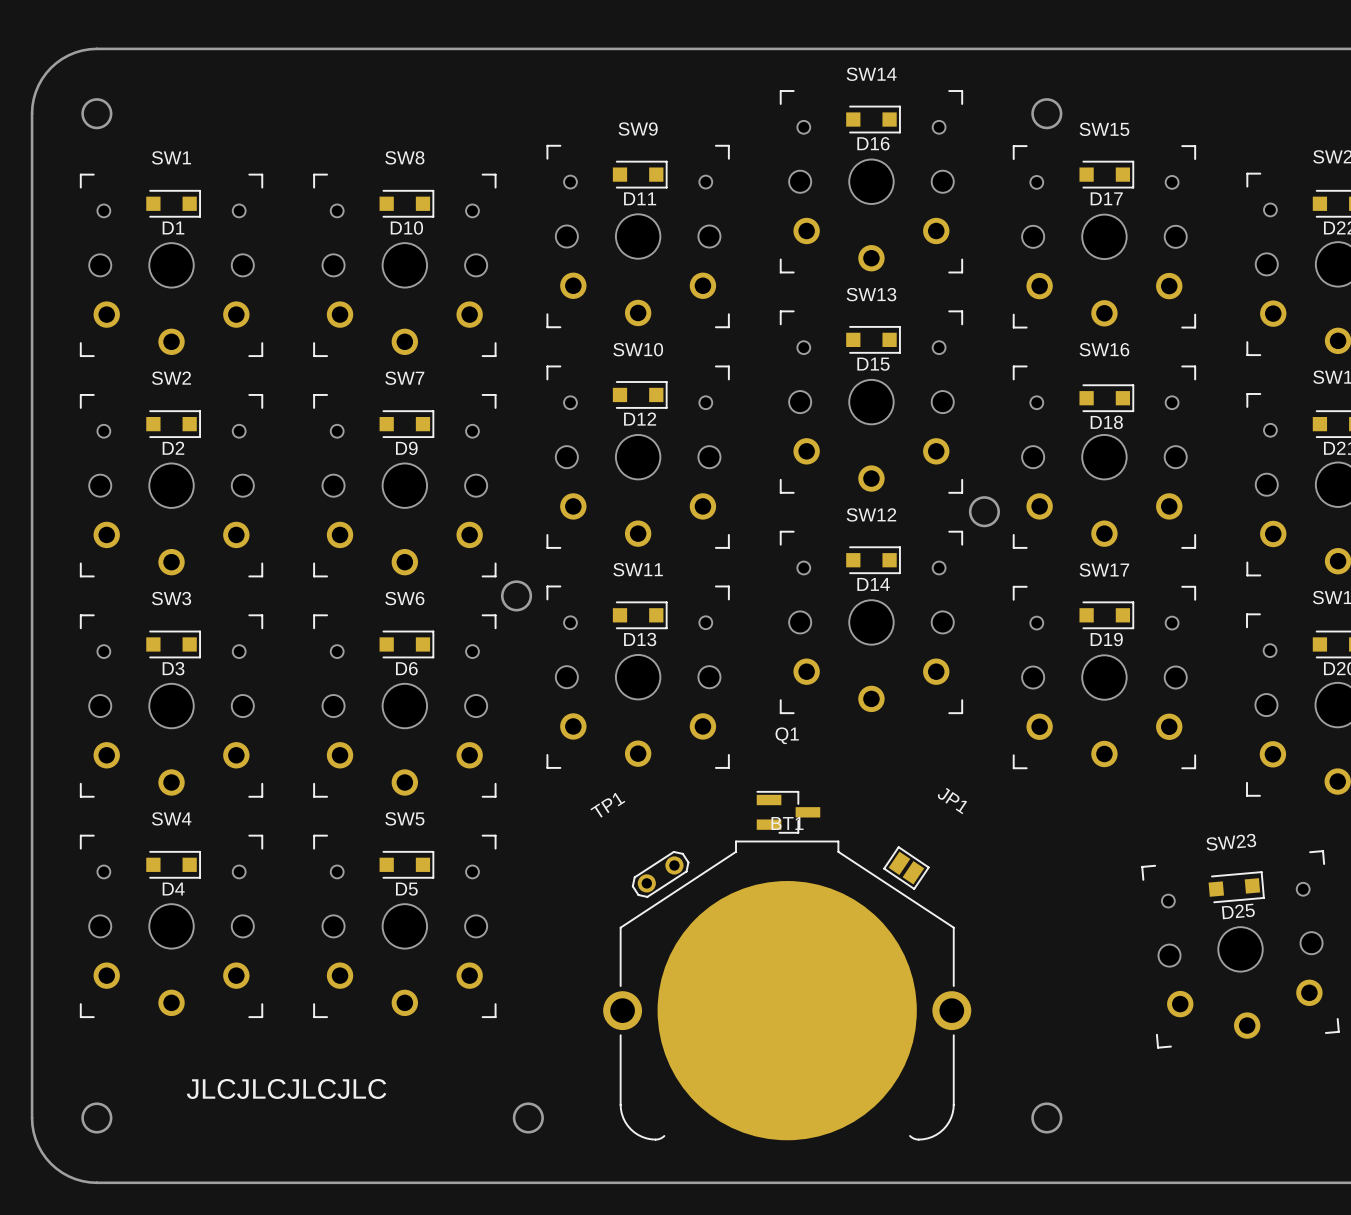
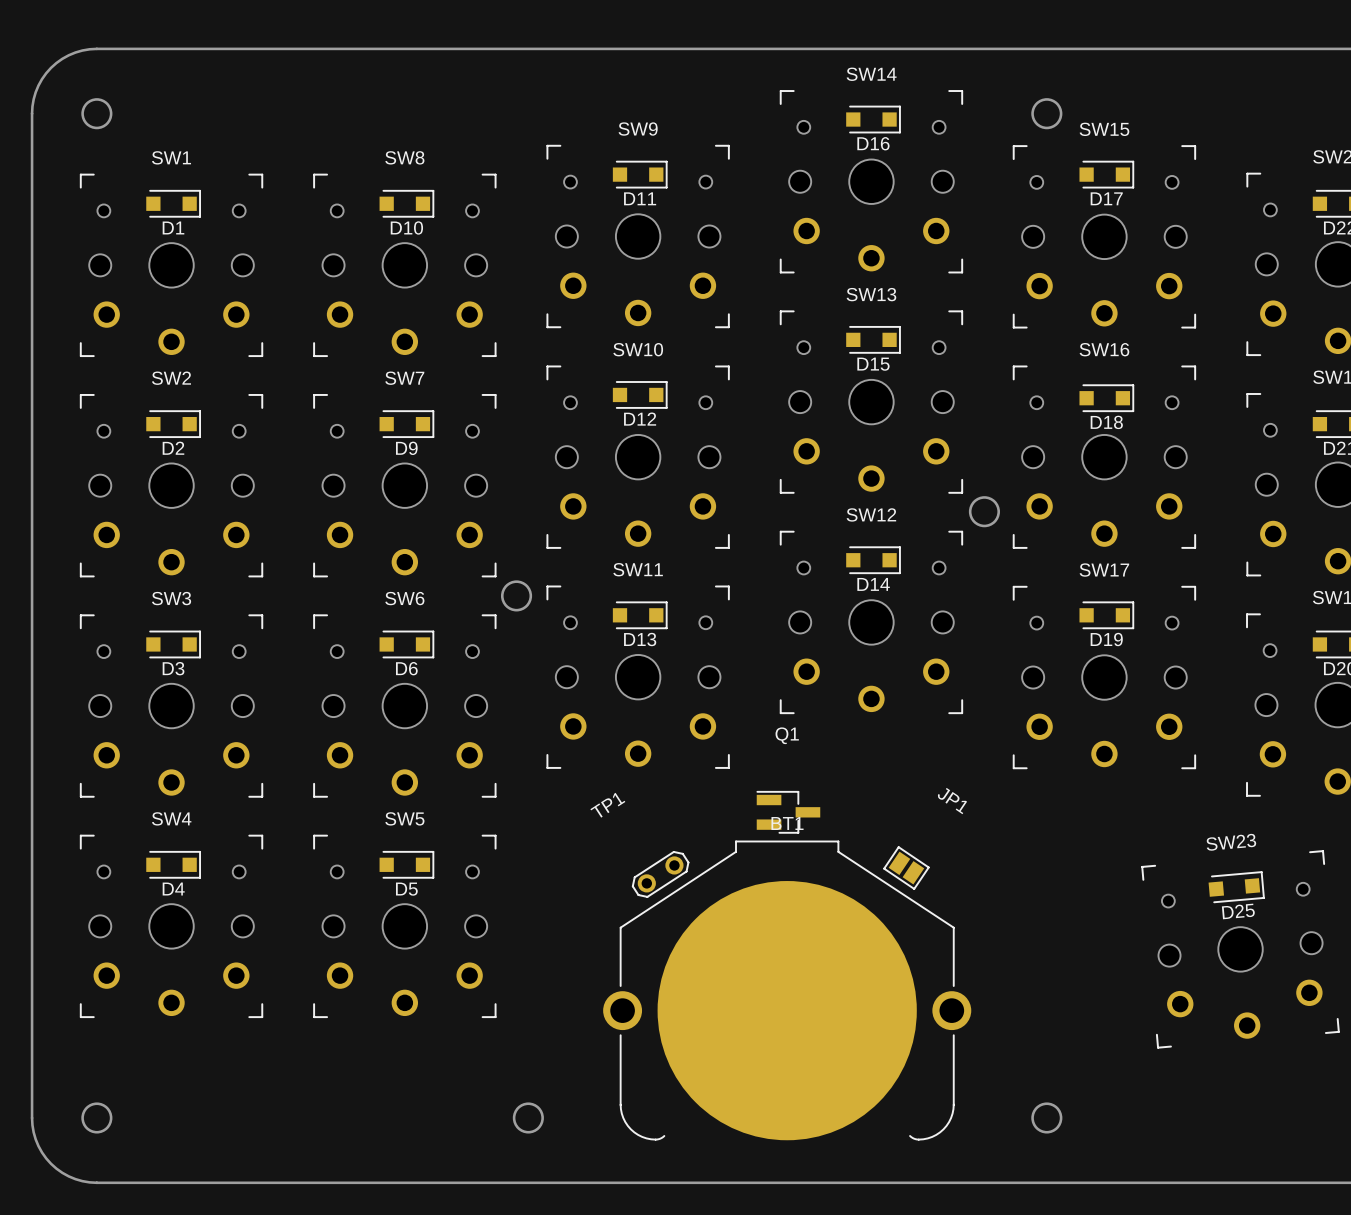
text: JLCJLCJLCJLC (286, 1088) -> none

